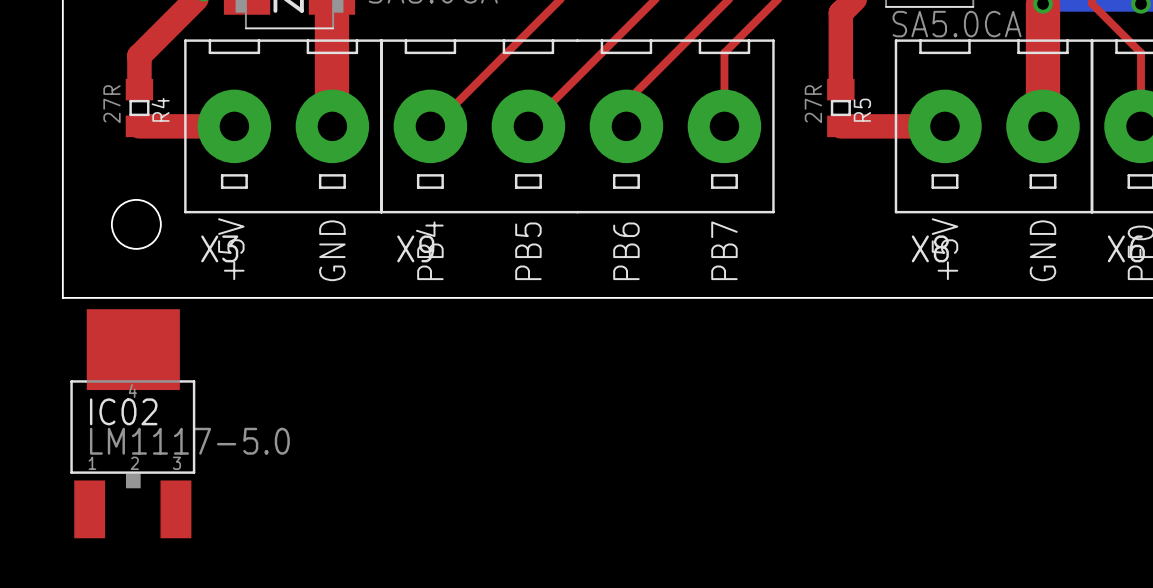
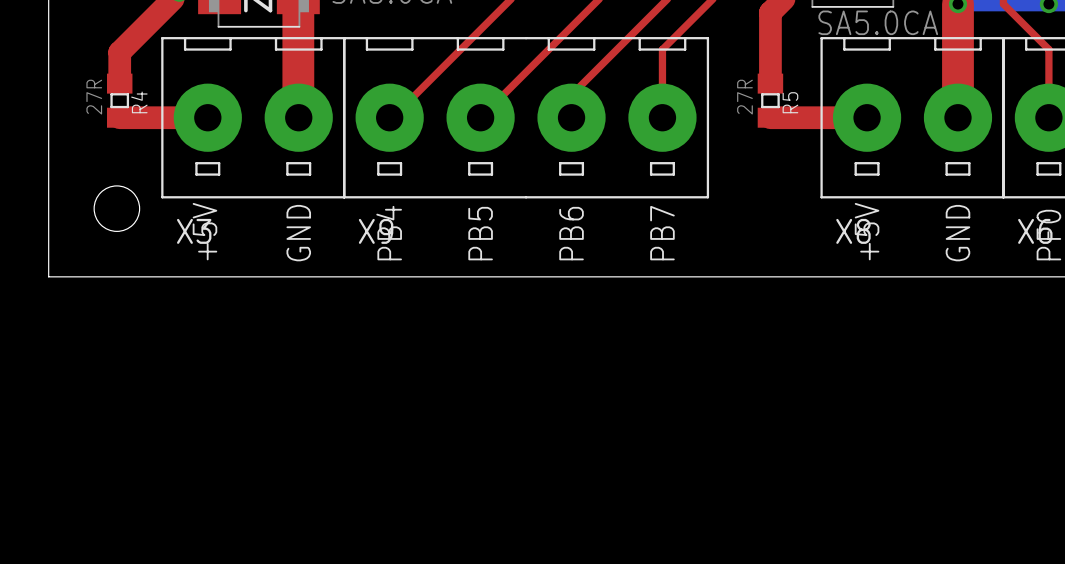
IC02: LM1117-5.0 (132, 423) -> none

